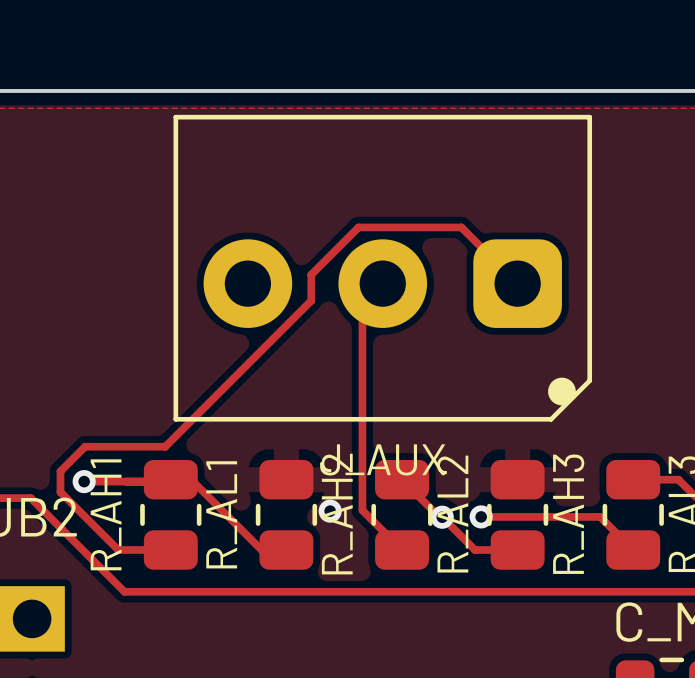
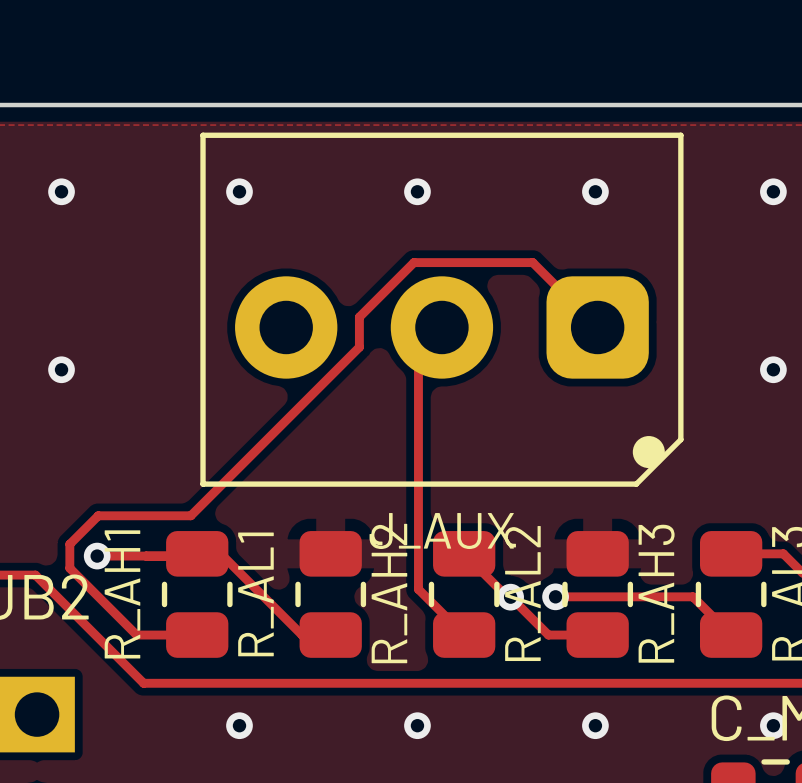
via: none -> (61, 191)
via: none -> (239, 191)
via: none -> (417, 191)
via: none -> (595, 191)
via: none -> (773, 191)
via: none -> (61, 369)
via: none -> (773, 369)
via: (330, 511) -> none
via: none -> (239, 725)
via: none -> (417, 725)
via: none -> (595, 725)
via: none -> (773, 725)

